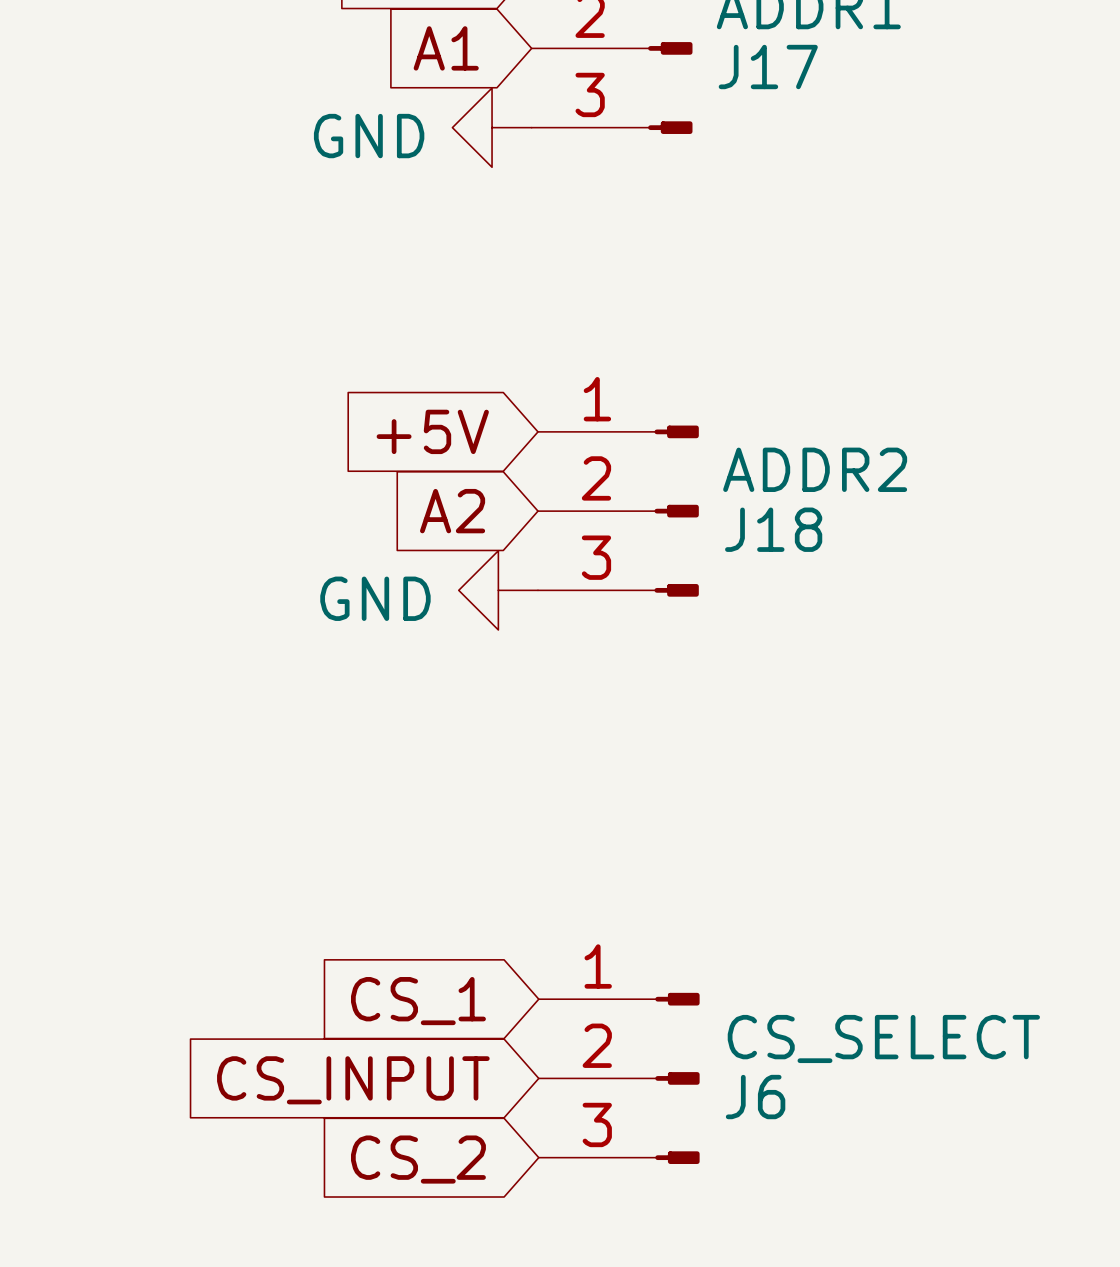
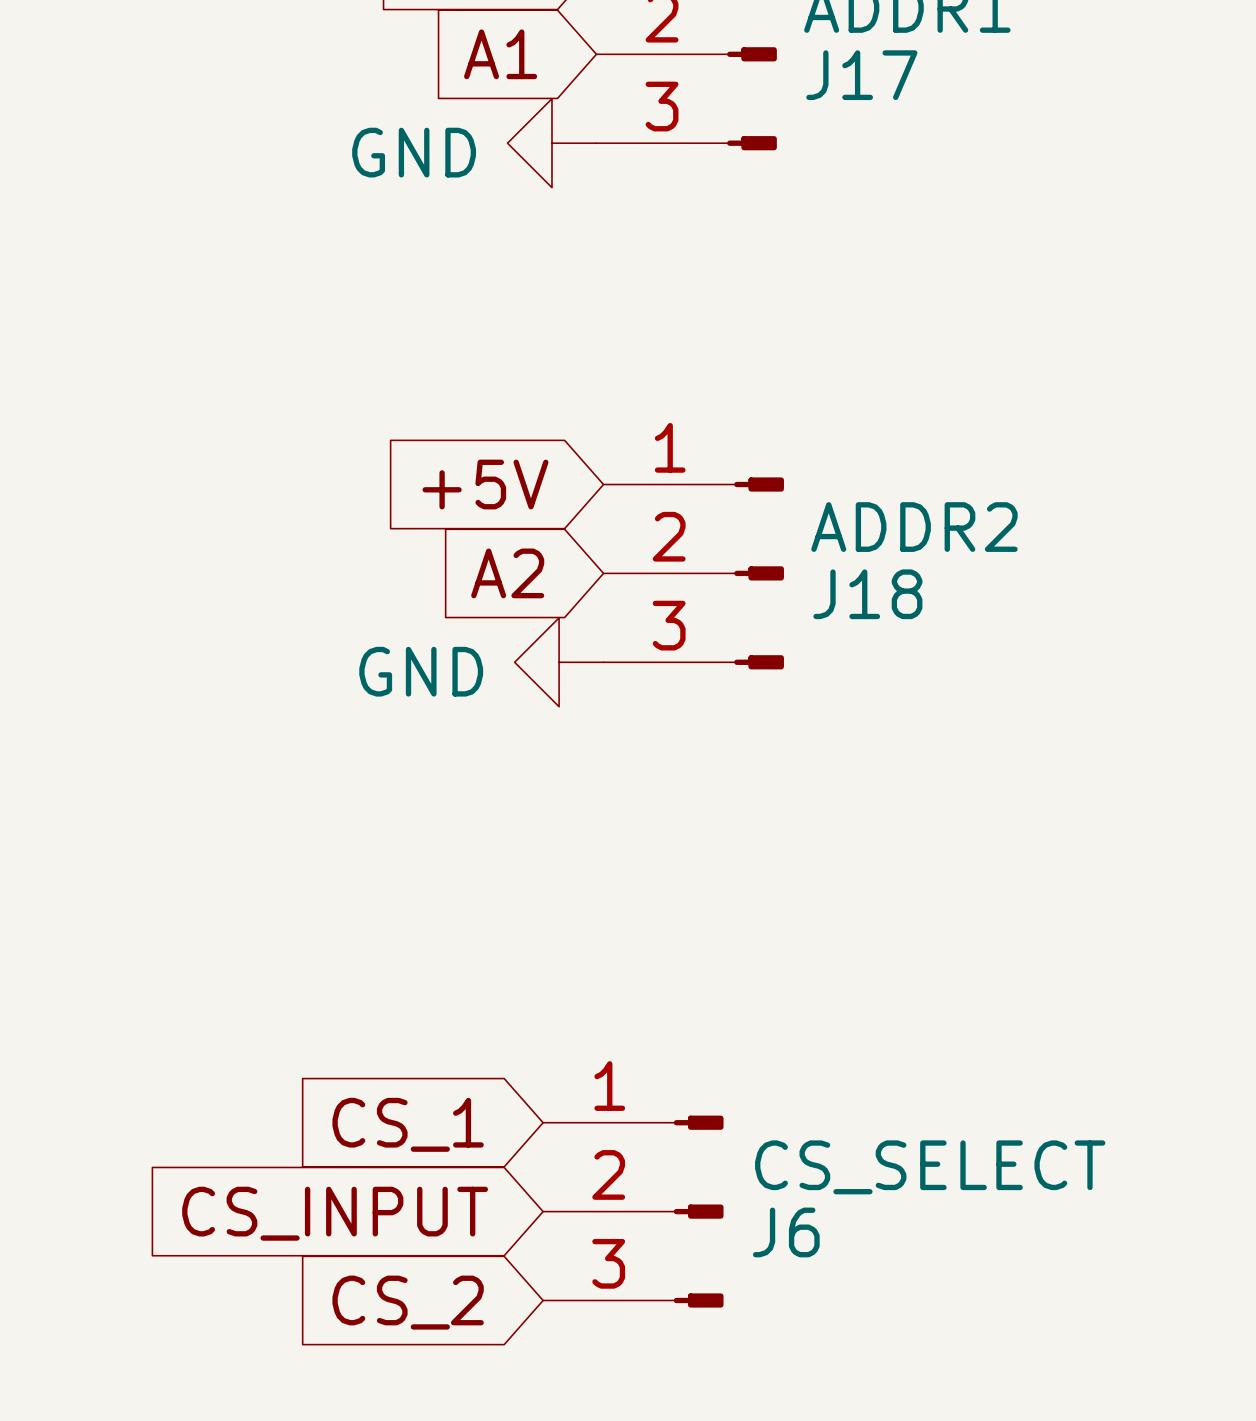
global label position: CS_1 (418, 1001) -> CS_1 (408, 1124)
J6 position: (619, 1078) -> (633, 1211)
global label position: CS_INPUT (353, 1080) -> CS_INPUT (335, 1213)
global label position: CS_2 (418, 1159) -> CS_2 (408, 1302)

